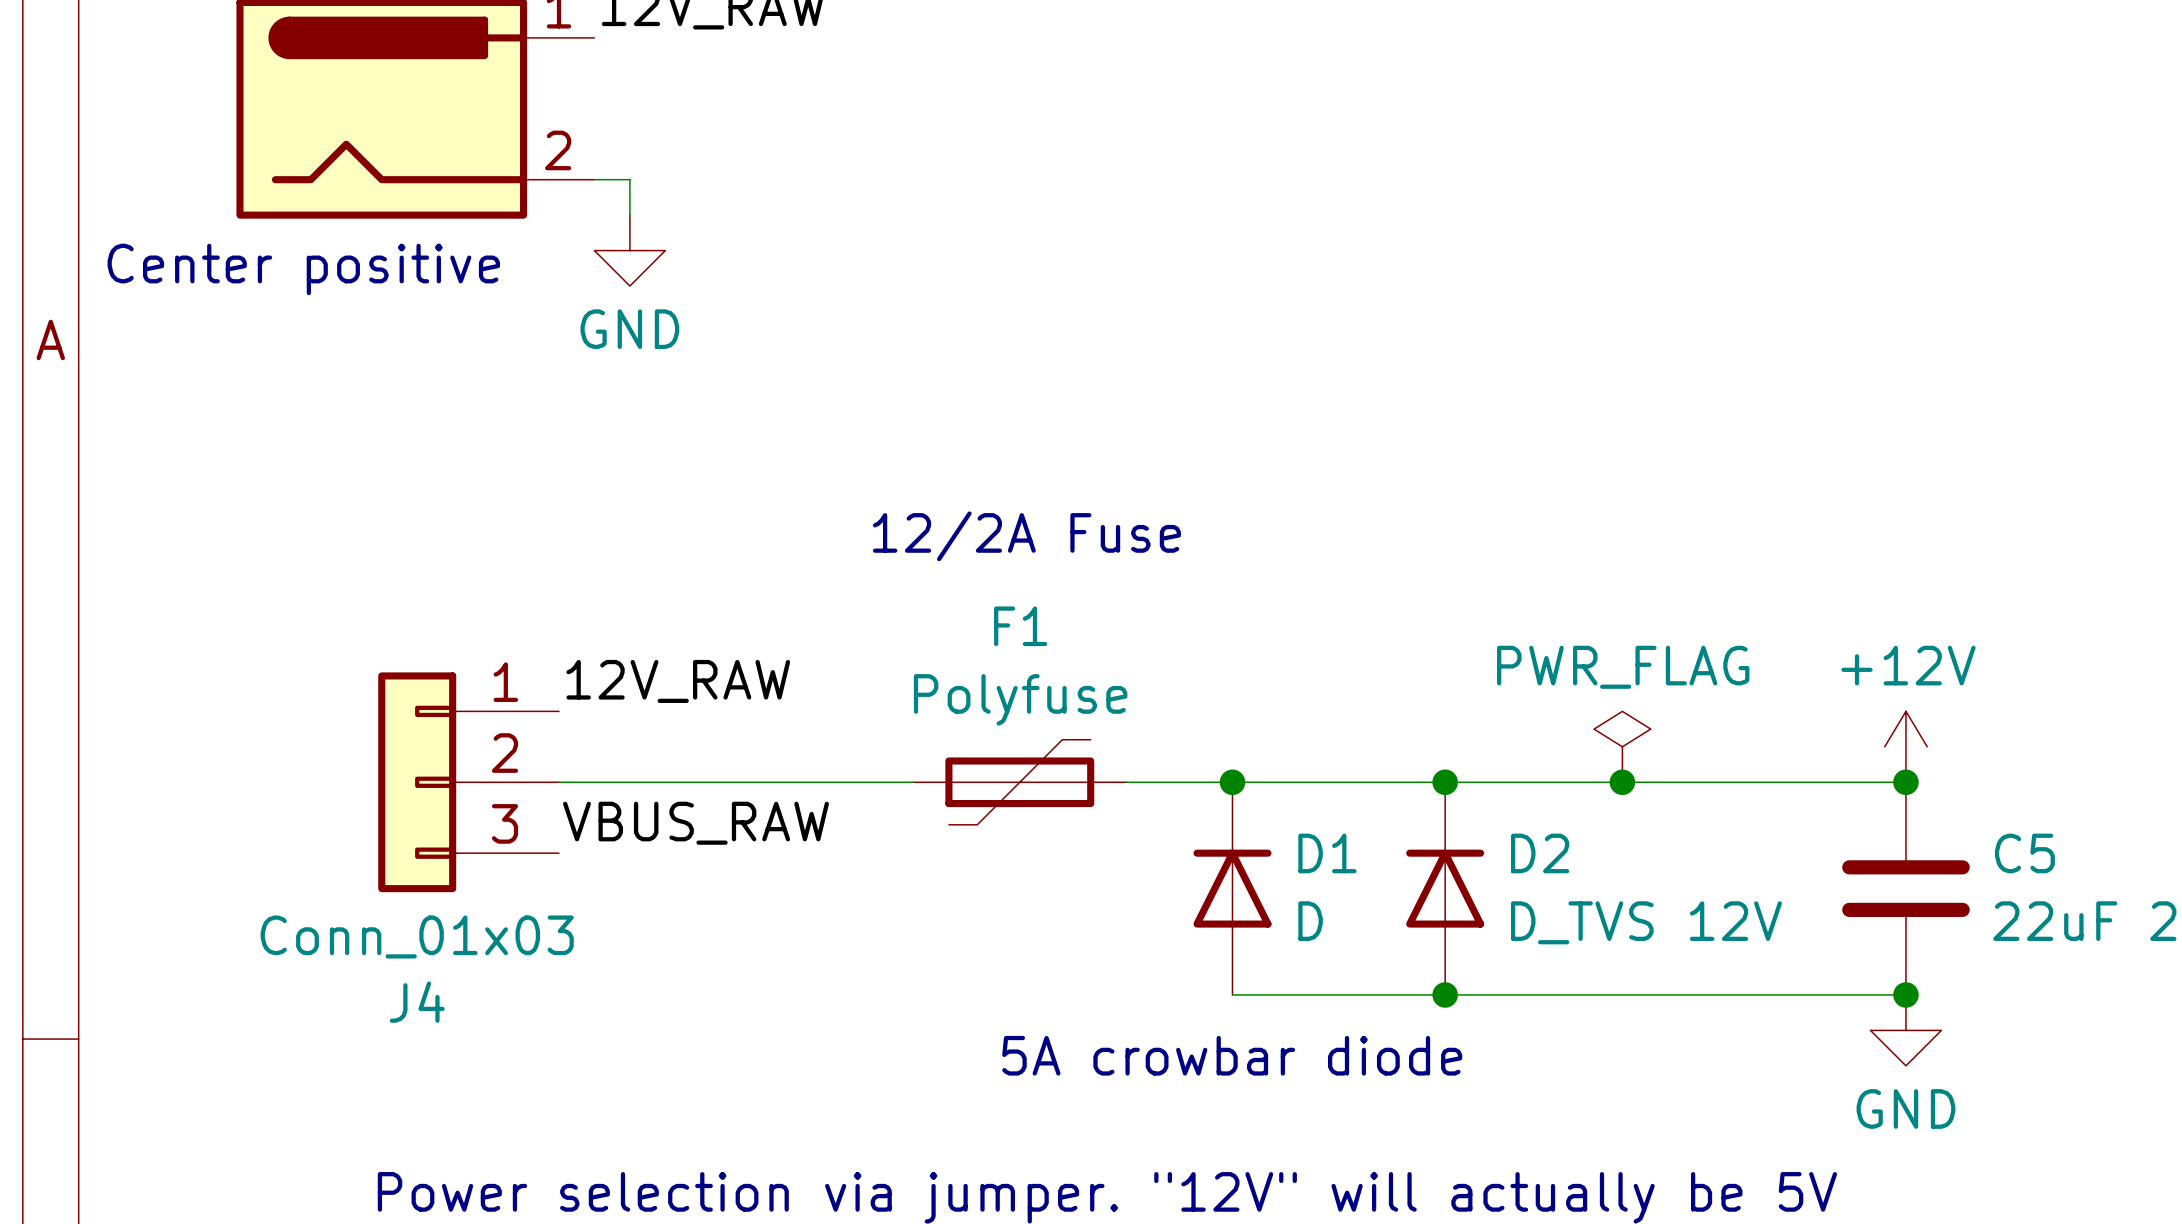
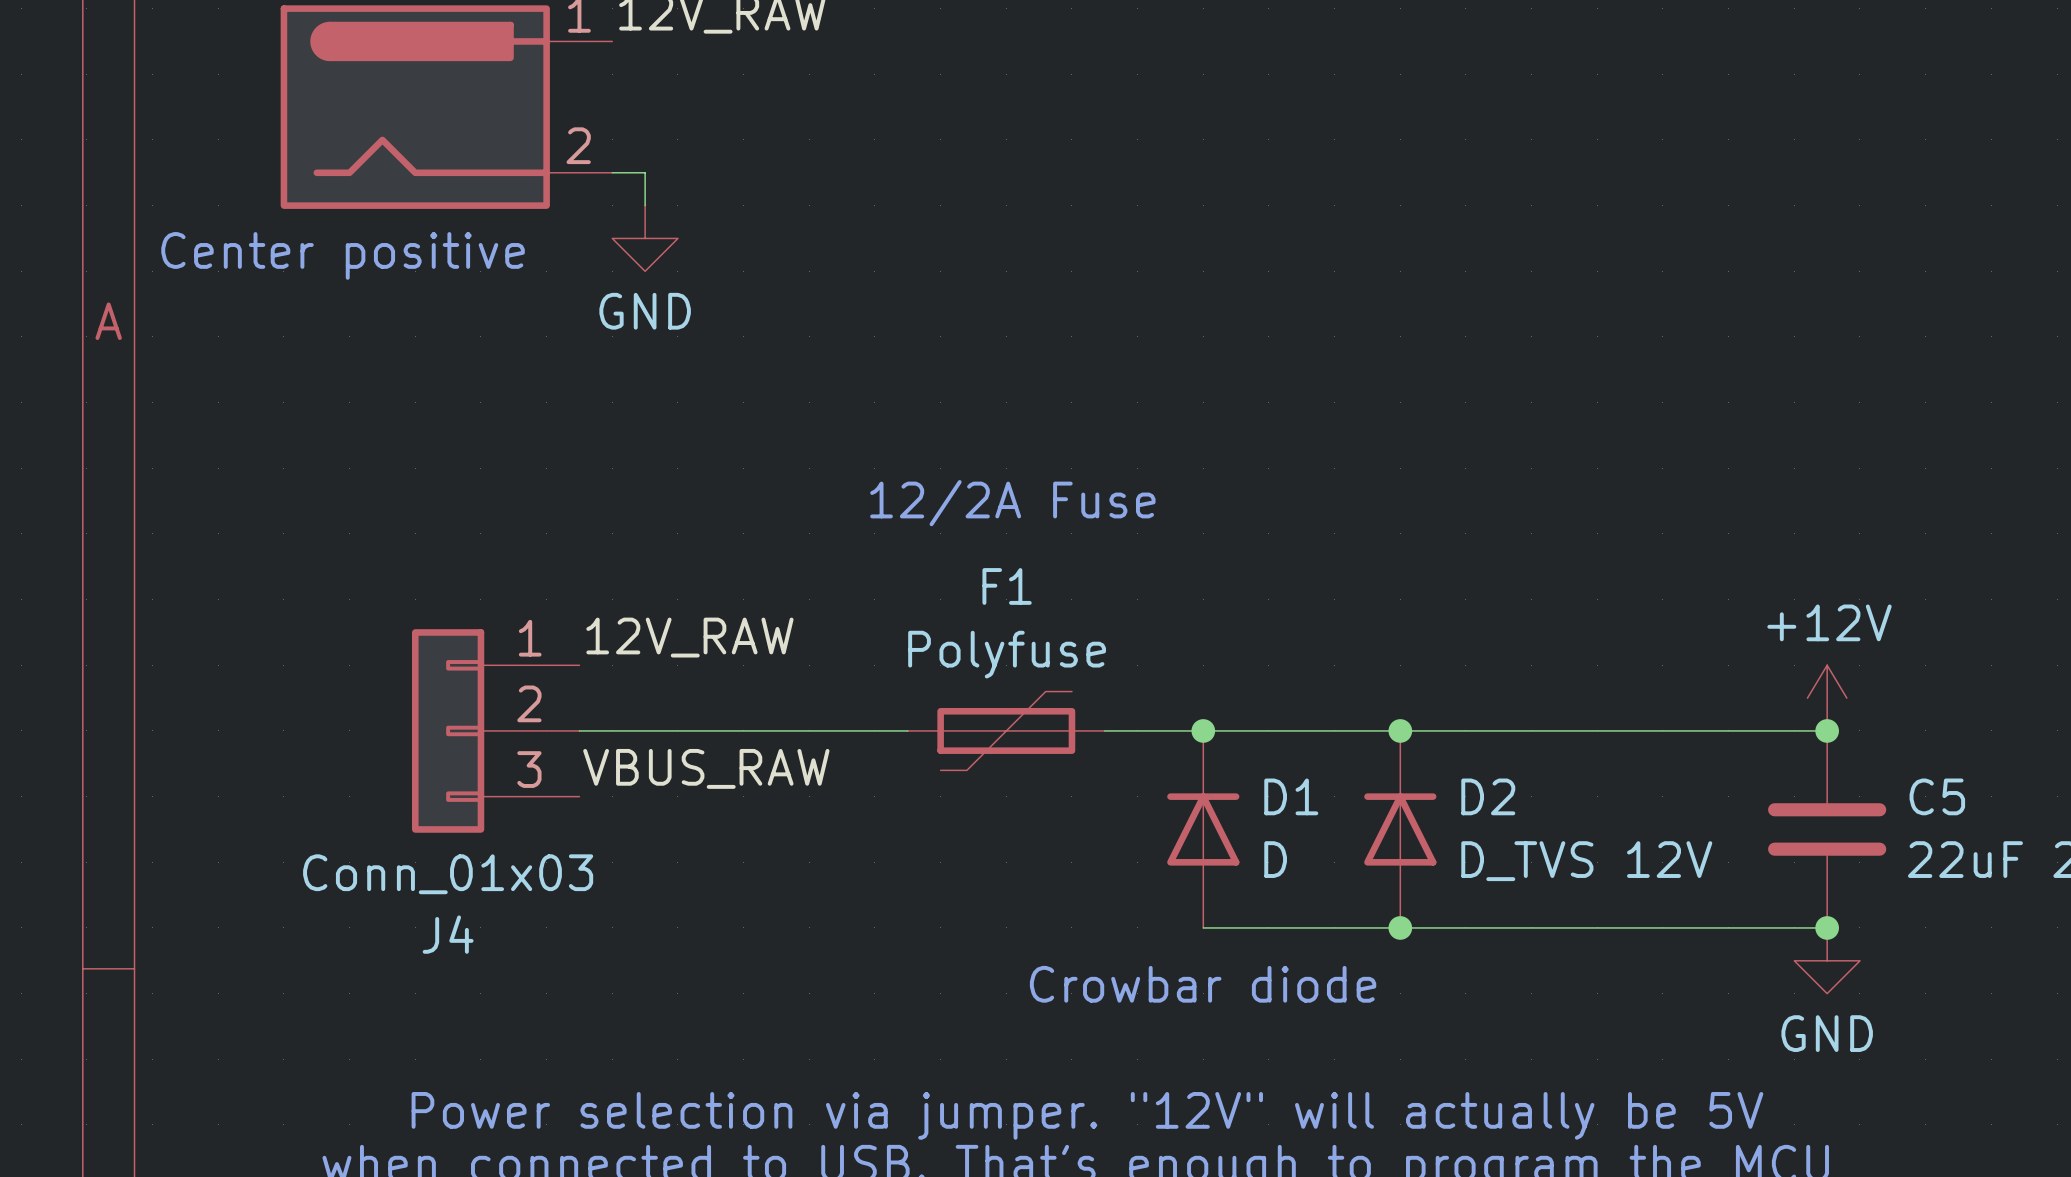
power symbol: PWR_FLAG (1622, 746) -> none
junction: (1622, 782) -> none
text: 5A crowbar diode (1232, 1055) -> Crowbar diode (1203, 984)

